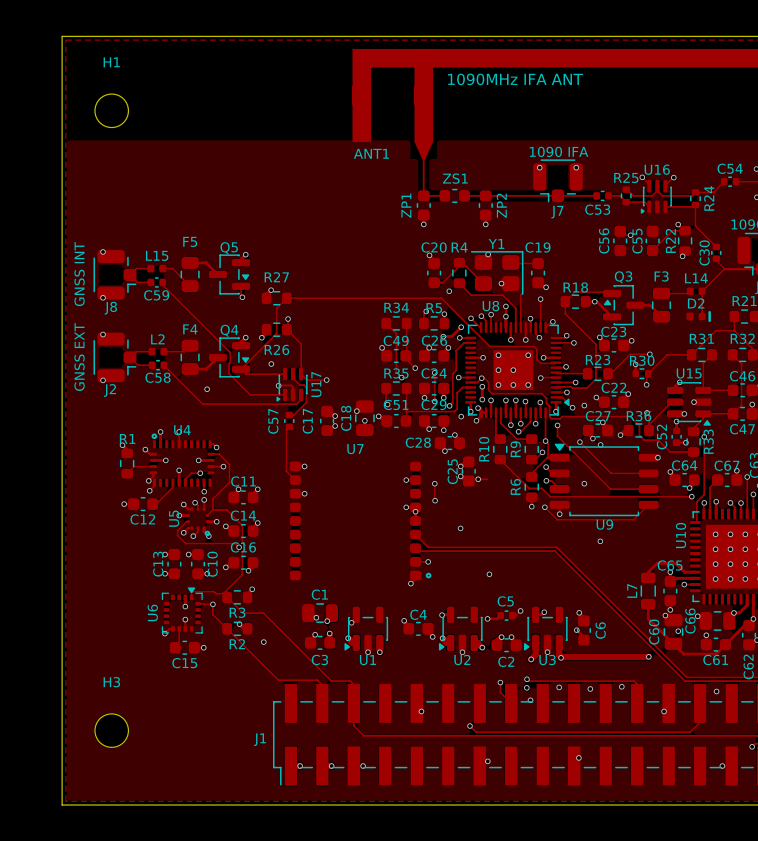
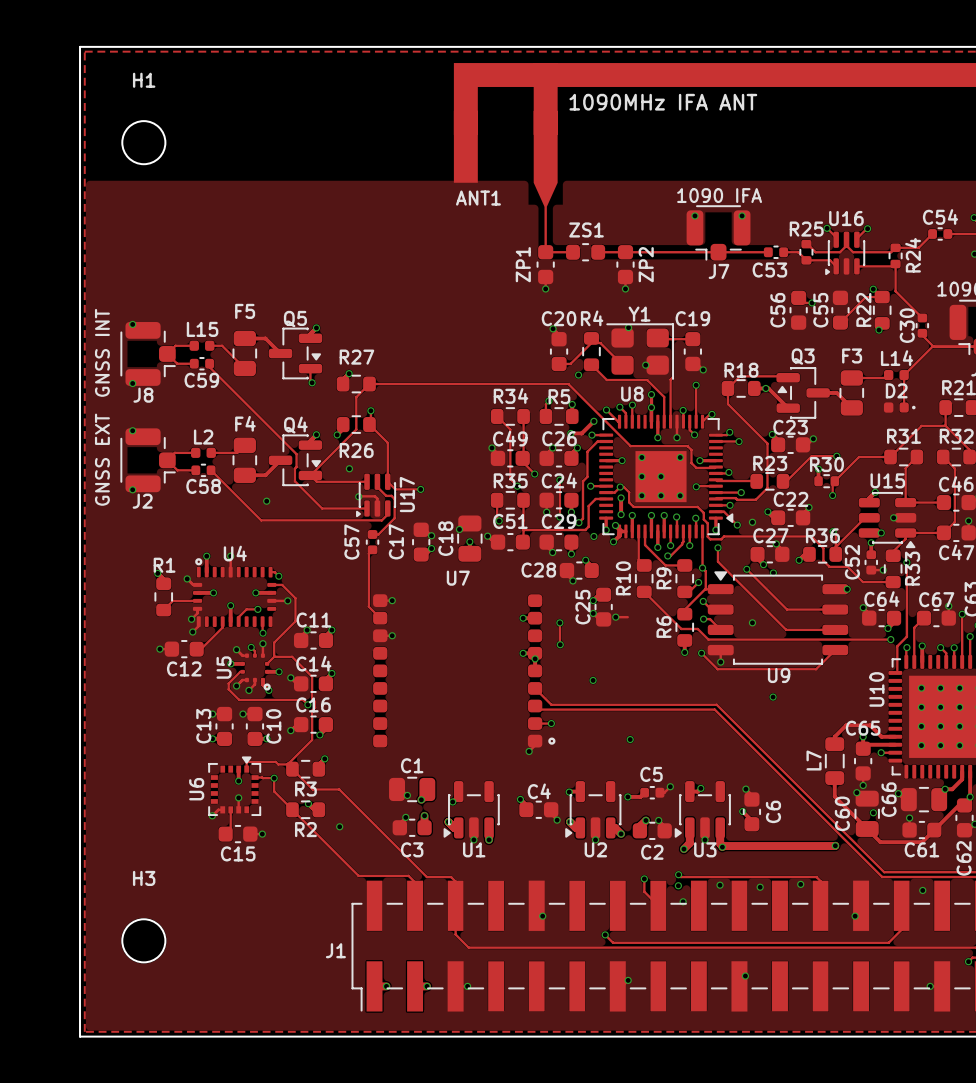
D2 footprint: [686, 312, 706, 321] -> [883, 402, 916, 413]
line: (709, 312) (709, 320) -> none

